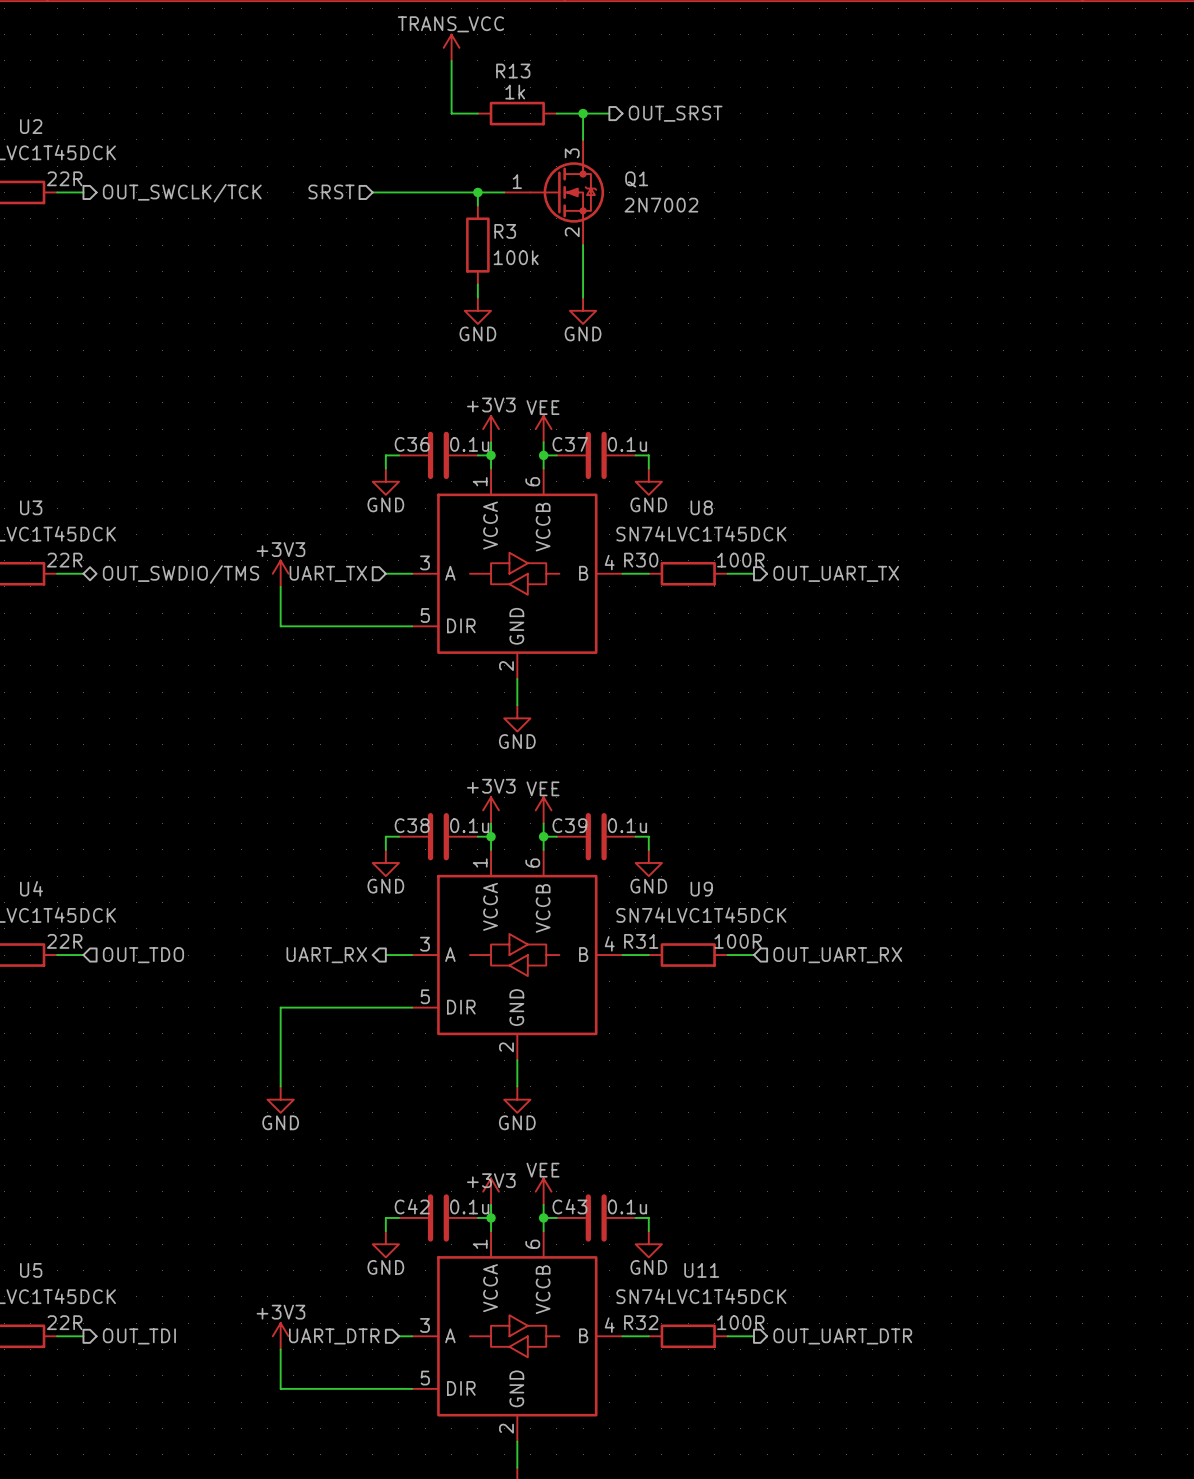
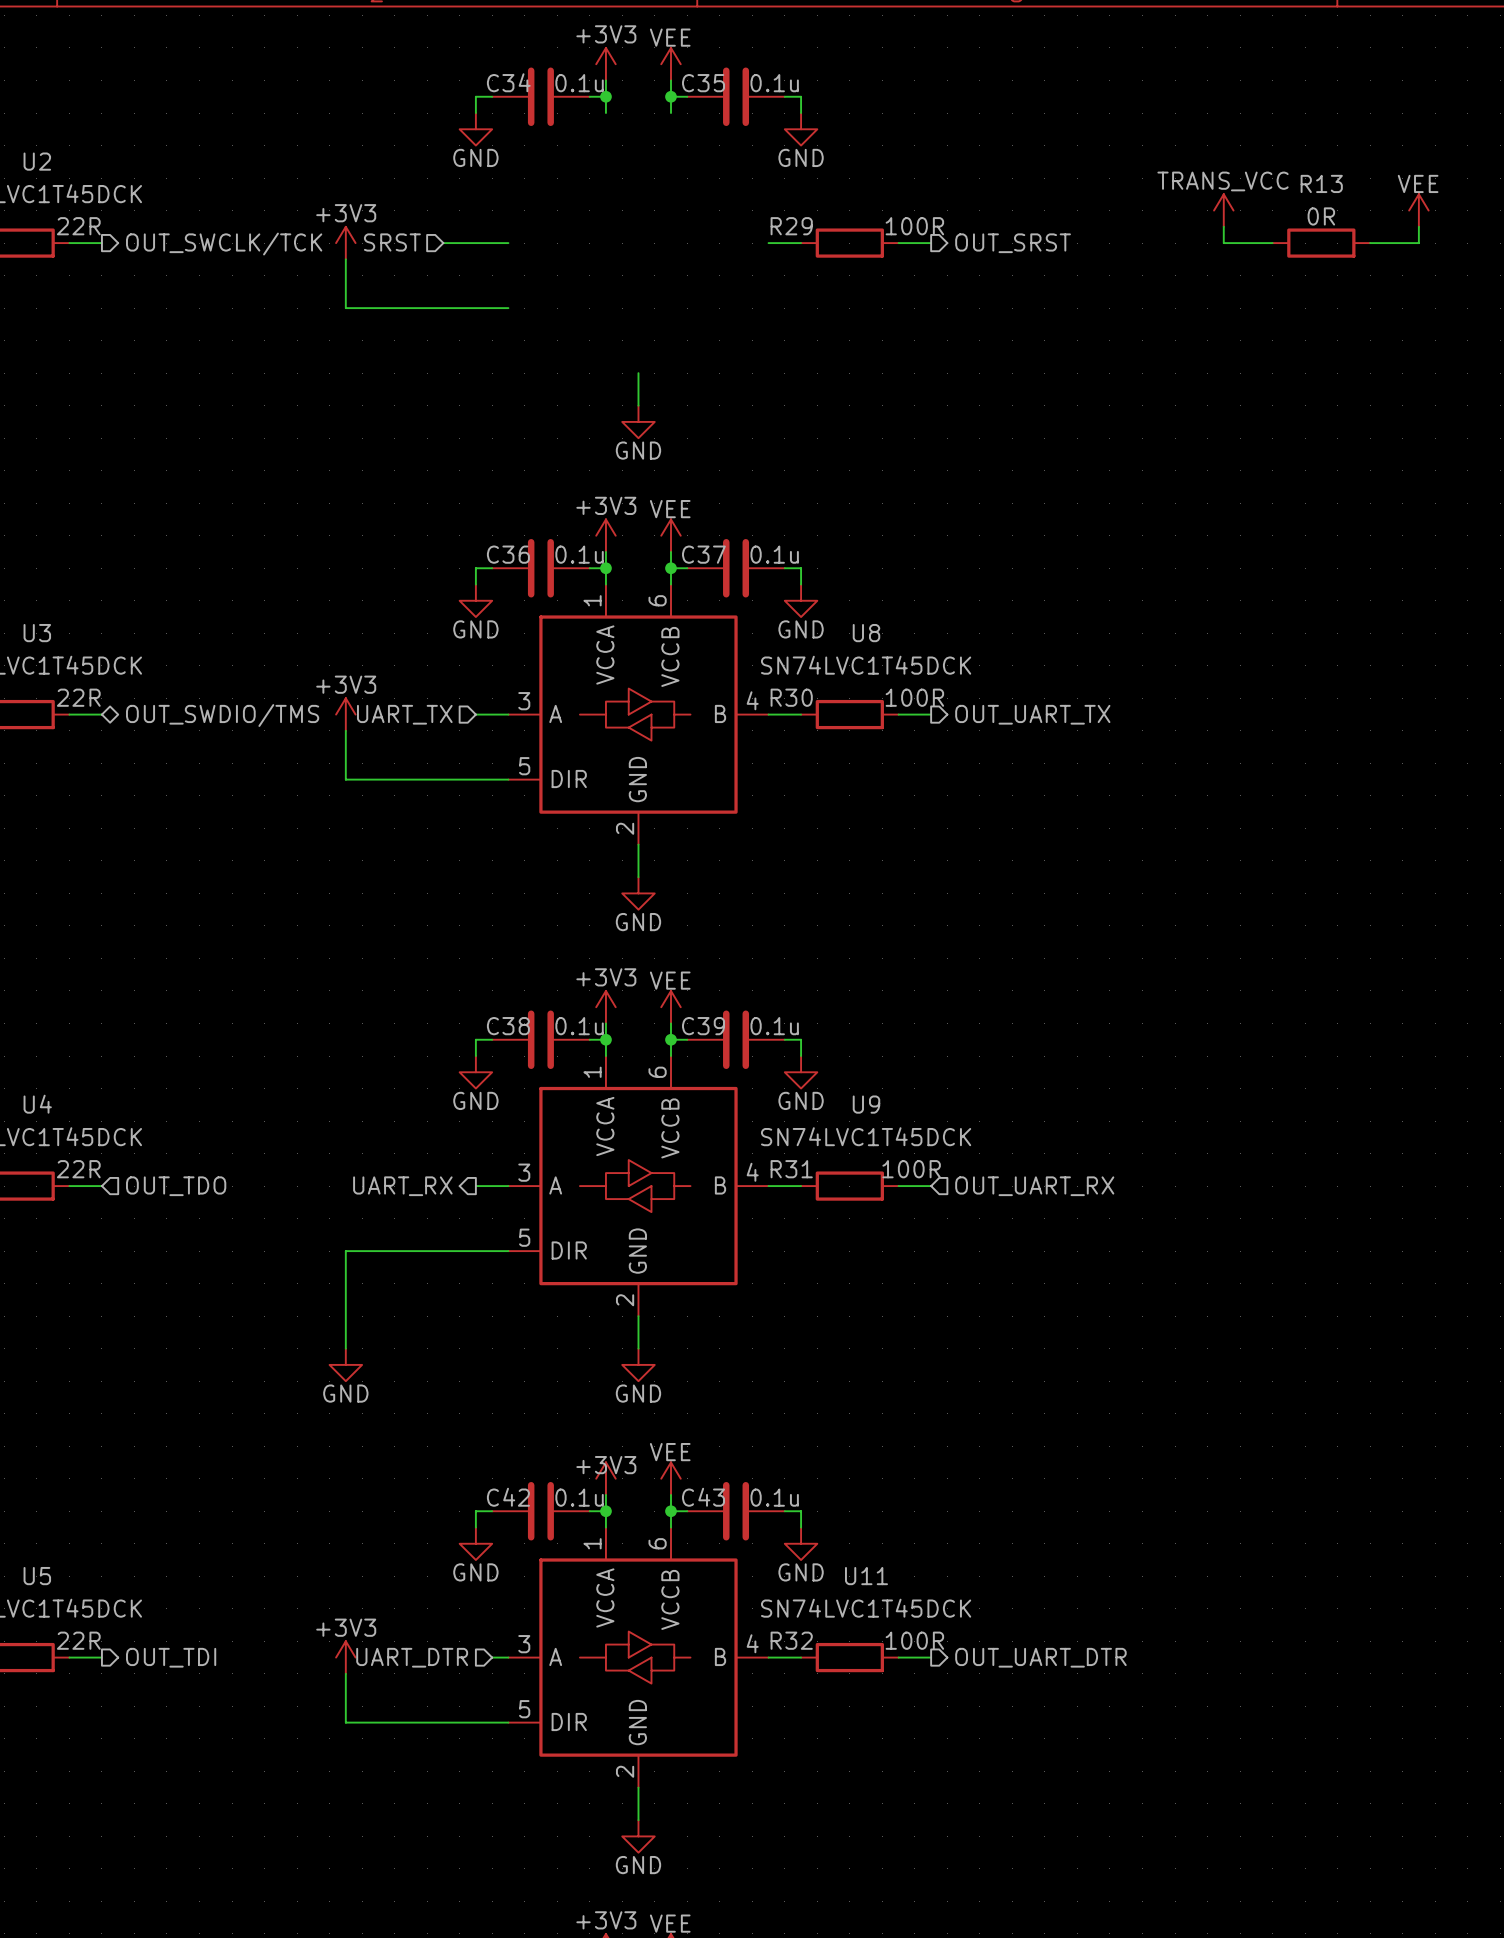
power symbol: TRANS_VCC (451, 47) -> none
power symbol: none -> +3V3 (605, 64)
power symbol: none -> VEE (671, 64)
wire: (451, 60) (451, 113) (477, 113) -> none
wire: none -> (605, 80) (605, 113)
R13 name position: R13 (513, 71) -> R13 (1321, 183)
wire: none -> (492, 96) (475, 96) (475, 113)
C34: none -> 0.1u (540, 96)
wire: none -> (589, 96) (605, 96)
junction: none -> (605, 96)
wire: none -> (671, 96) (687, 96)
junction: none -> (671, 96)
C35: none -> 0.1u (736, 96)
wire: none -> (784, 96) (801, 96) (801, 113)
R13 value: 1k (515, 92) -> 0R (1321, 216)
power symbol: none -> GND (475, 129)
power symbol: none -> GND (801, 129)
R13 position: (517, 113) -> (1321, 243)
wire: (556, 113) (609, 113) -> none
wire: (583, 113) (583, 139) -> (671, 80) (671, 113)
junction: (583, 113) -> none
hierarchical label position: OUT_SRST (675, 113) -> OUT_SRST (1013, 243)
power symbol: none -> TRANS_VCC (1223, 210)
power symbol: none -> VEE (1418, 210)
wire: none -> (1223, 226) (1223, 243) (1272, 243)
wire: none -> (1418, 226) (1418, 243) (1370, 243)
hierarchical label position: SRST (331, 191) -> SRST (392, 242)
power symbol: none -> +3V3 (345, 243)
wire: none -> (443, 243) (459, 243)
wire: (412, 192) (504, 192) -> none
wire: (477, 192) (477, 205) -> none
junction: (477, 192) -> none
Q1: 2N7002 (554, 192) -> none
wire: none -> (768, 243) (801, 243)
R29: none -> 100R (849, 243)
wire: none -> (898, 243) (931, 243)
wire: none -> (345, 259) (345, 308) (508, 308)
R3: 100k (477, 245) -> none
wire: (583, 245) (583, 297) -> none
wire: (477, 284) (477, 297) -> none
wire: none -> (638, 373) (638, 405)
power symbol: GND (477, 310) -> none
power symbol: GND (583, 310) -> none
power symbol: none -> GND (638, 421)

